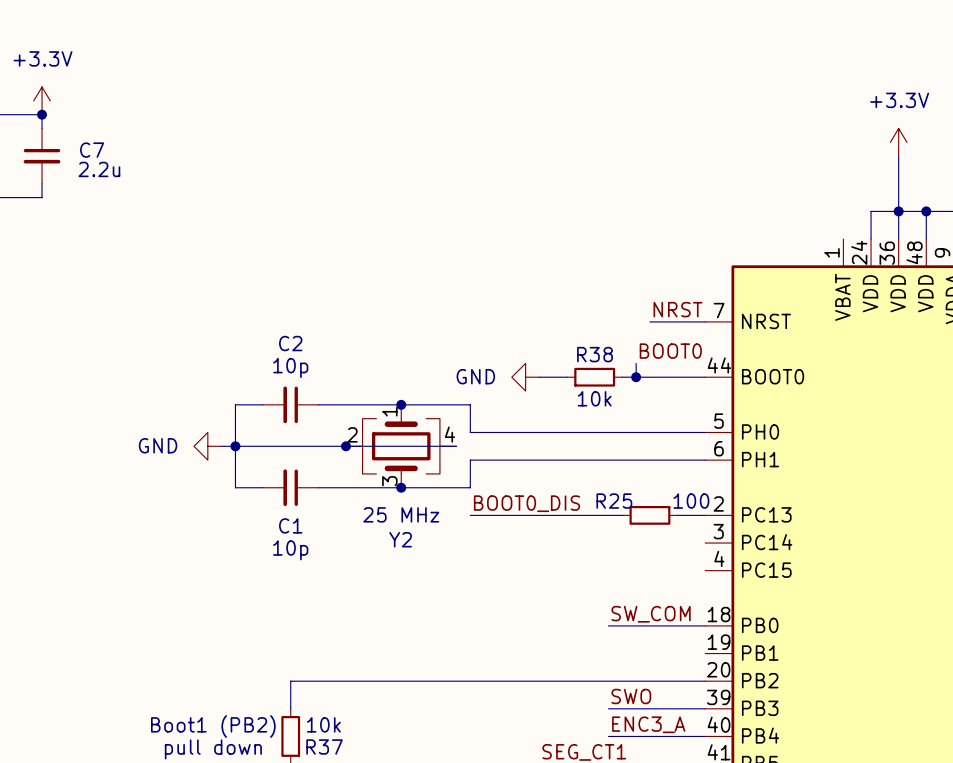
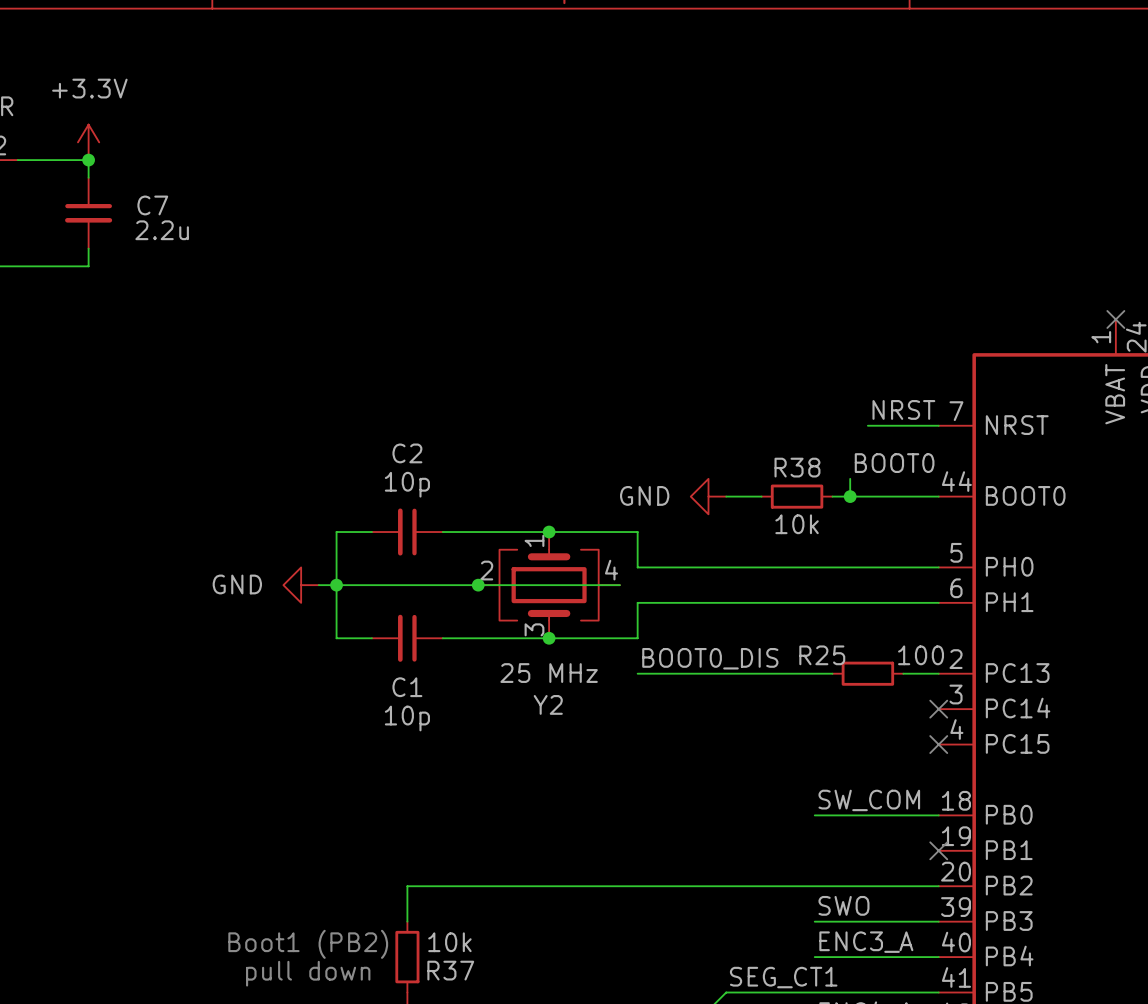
no-connect mark: none -> (1115, 319)
no-connect mark: none -> (938, 709)
no-connect mark: none -> (938, 744)
no-connect mark: none -> (938, 850)

